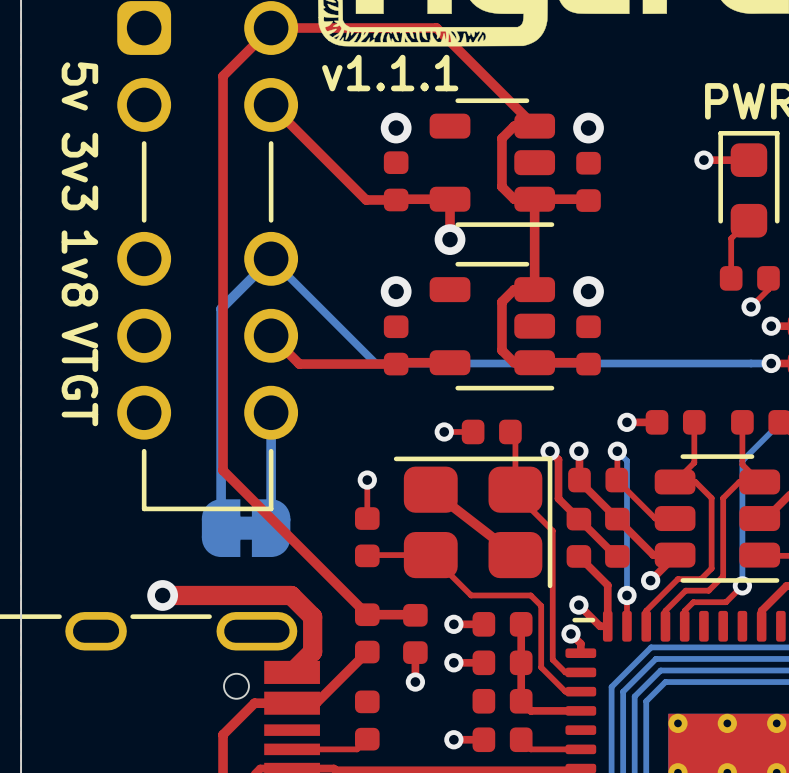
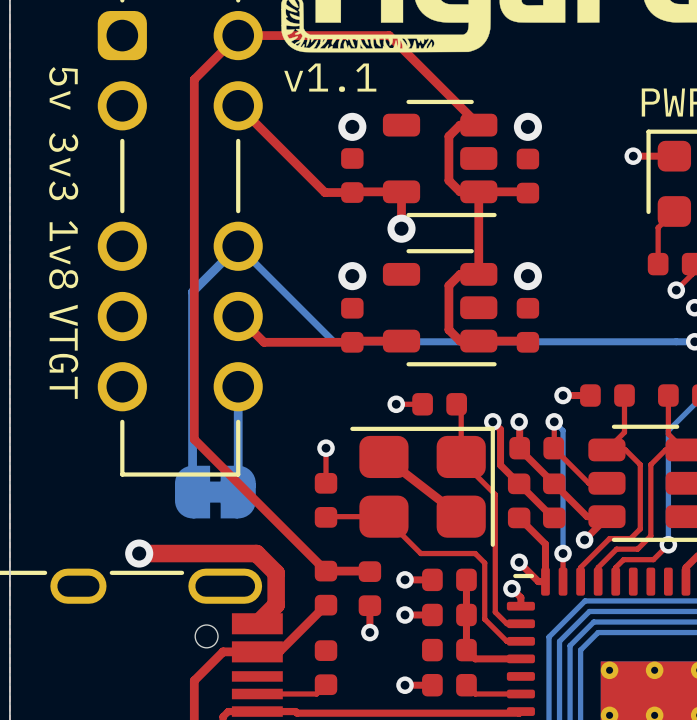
text: v1.1.1 (390, 73) -> v1.1 (330, 77)

